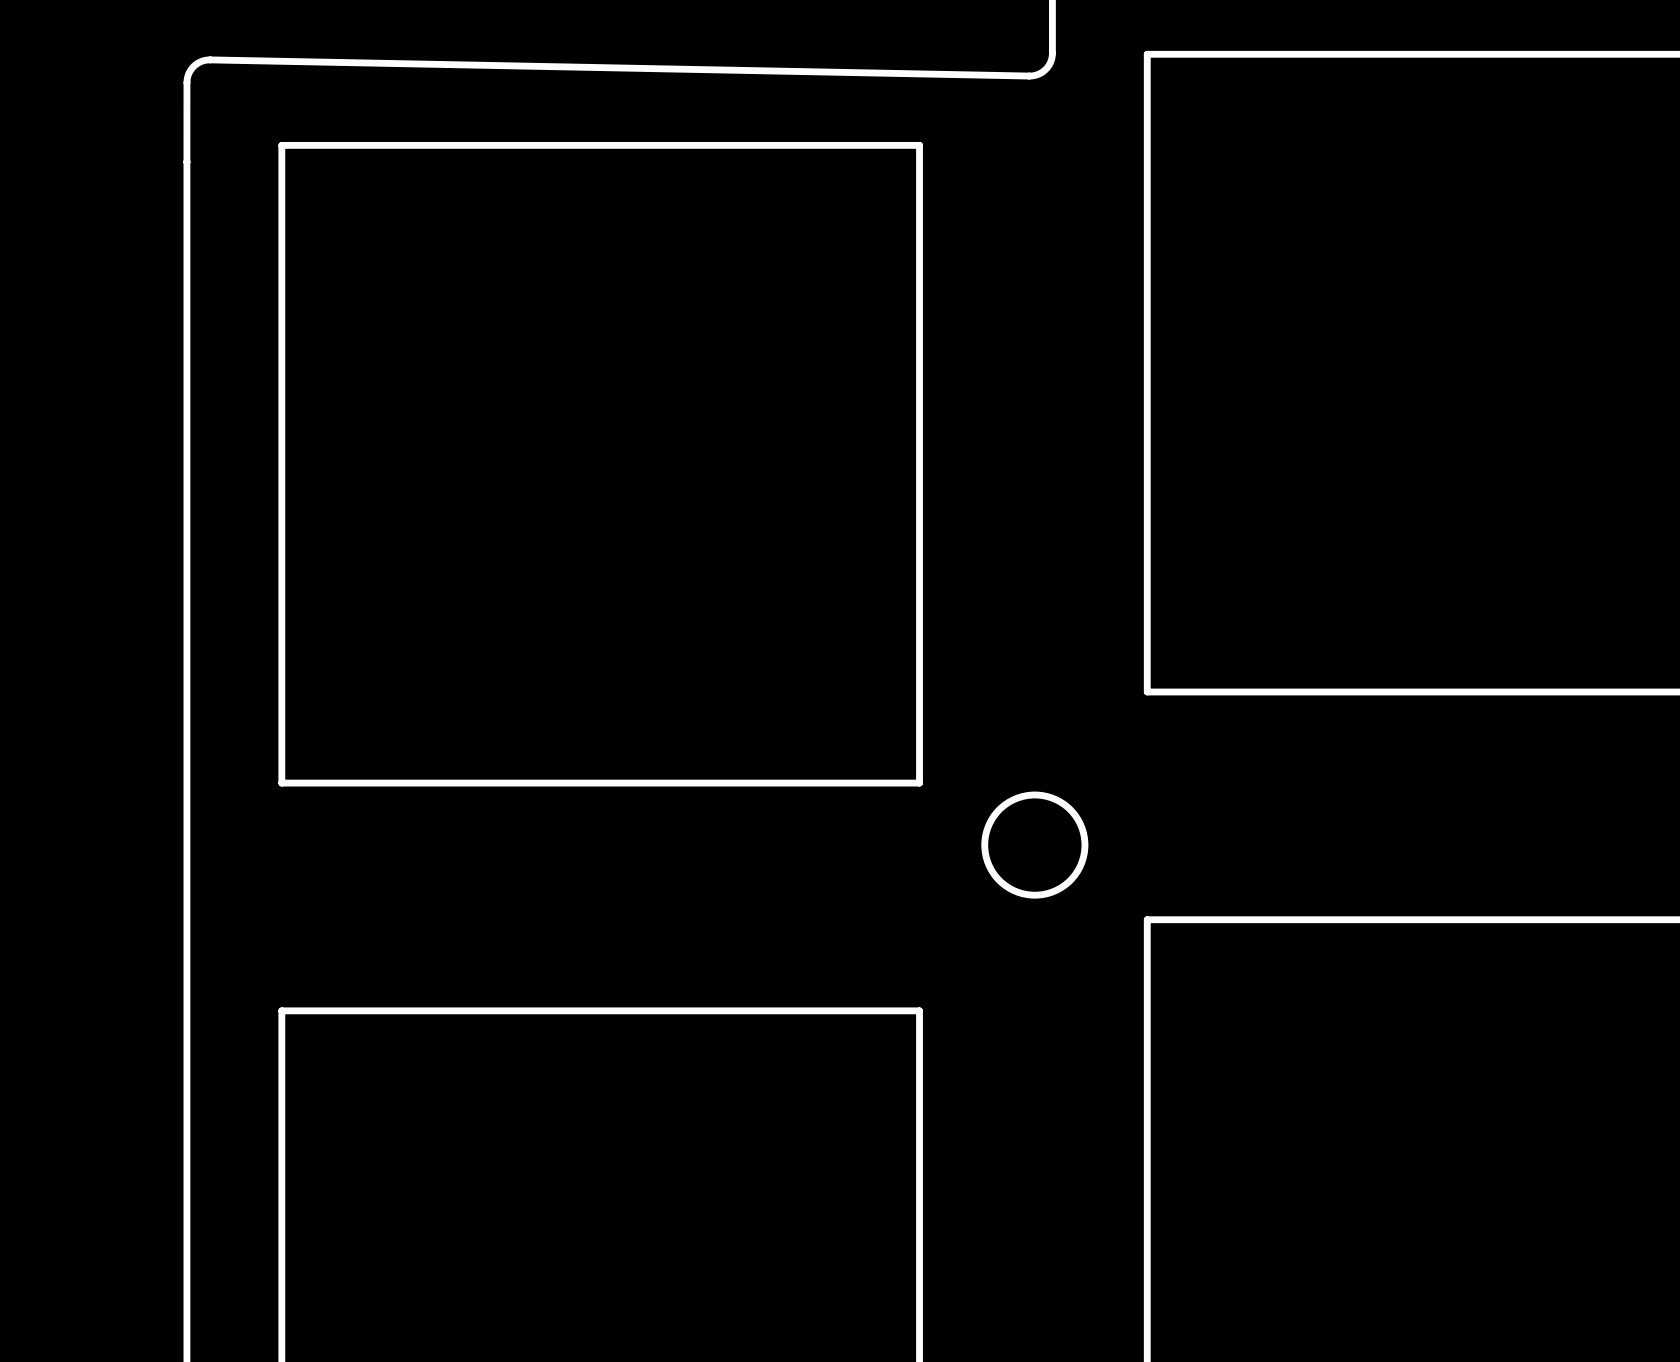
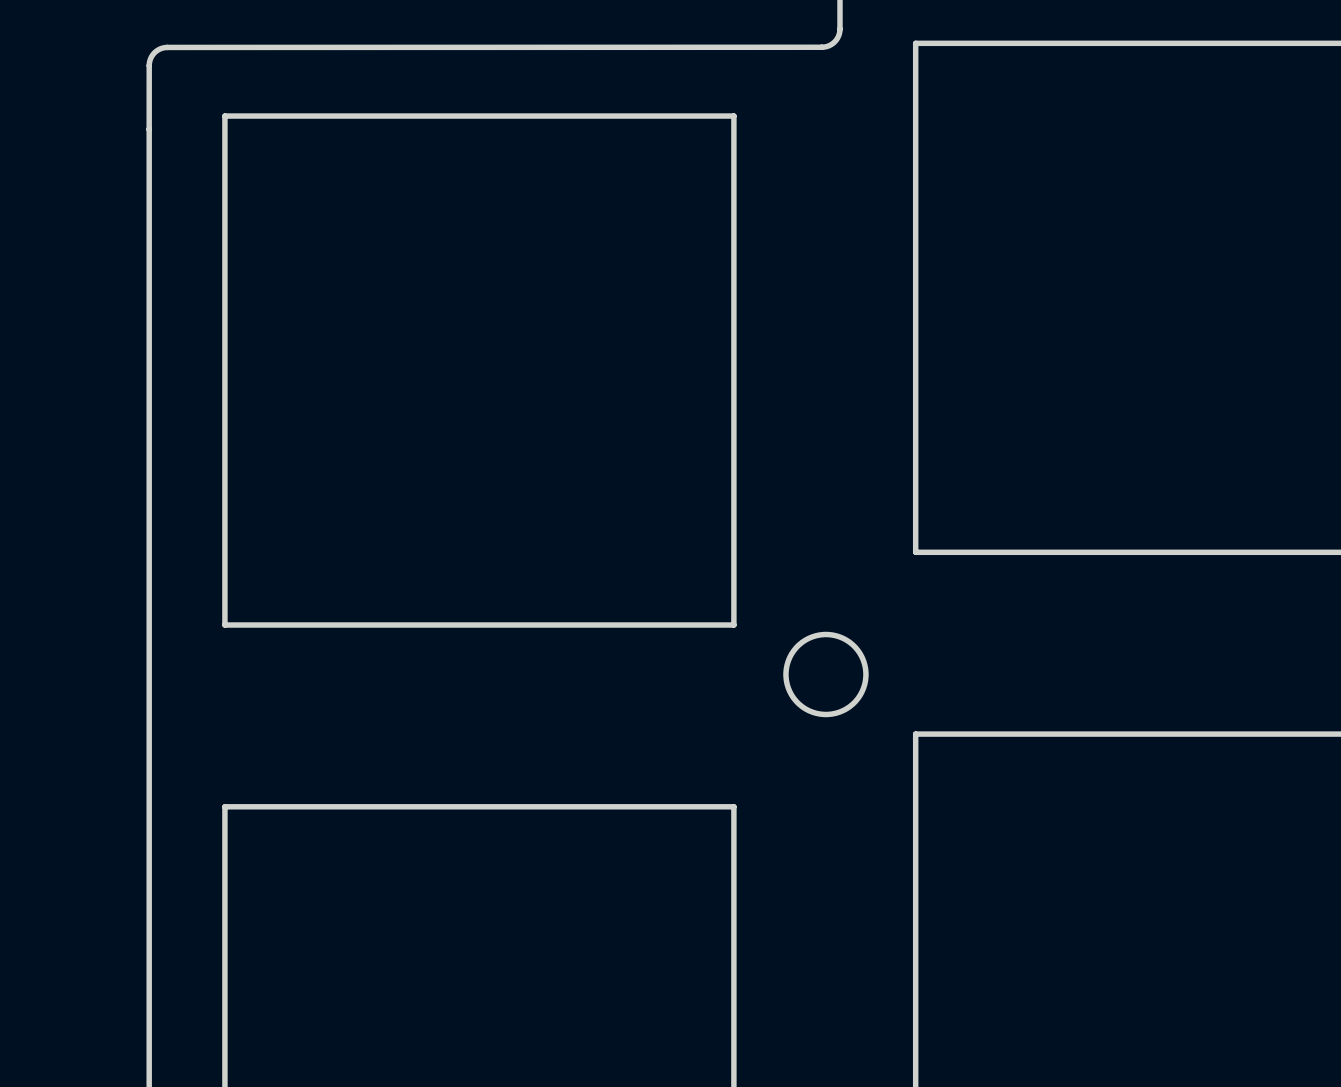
board edge: (1052, 36) (1052, 55) (1050, 63) (1041, 72) (1031, 75) (210, 59) (202, 61) (193, 66) (189, 72) (186, 82) -> (839, 29) (834, 41) (821, 47) (167, 47) (154, 52) (149, 65)

